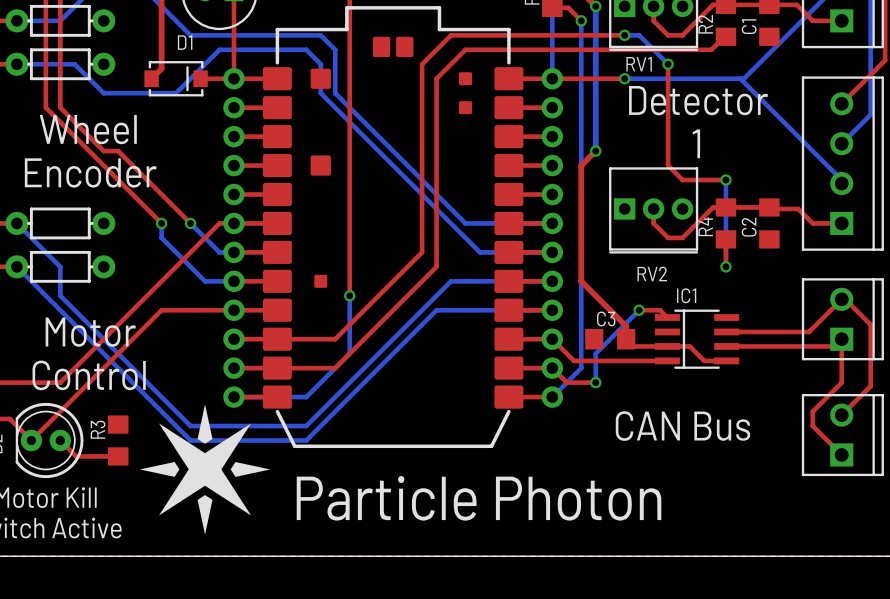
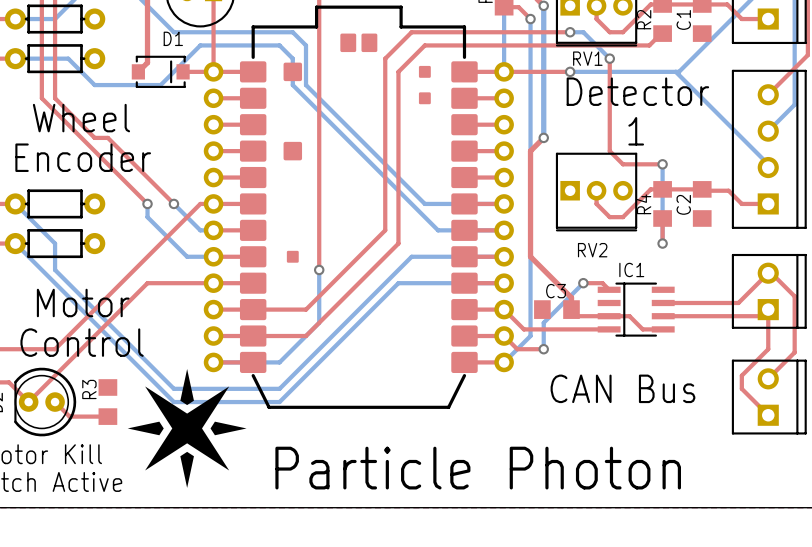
text position: Particle Photon (479, 498) -> Particle Photon (478, 468)

